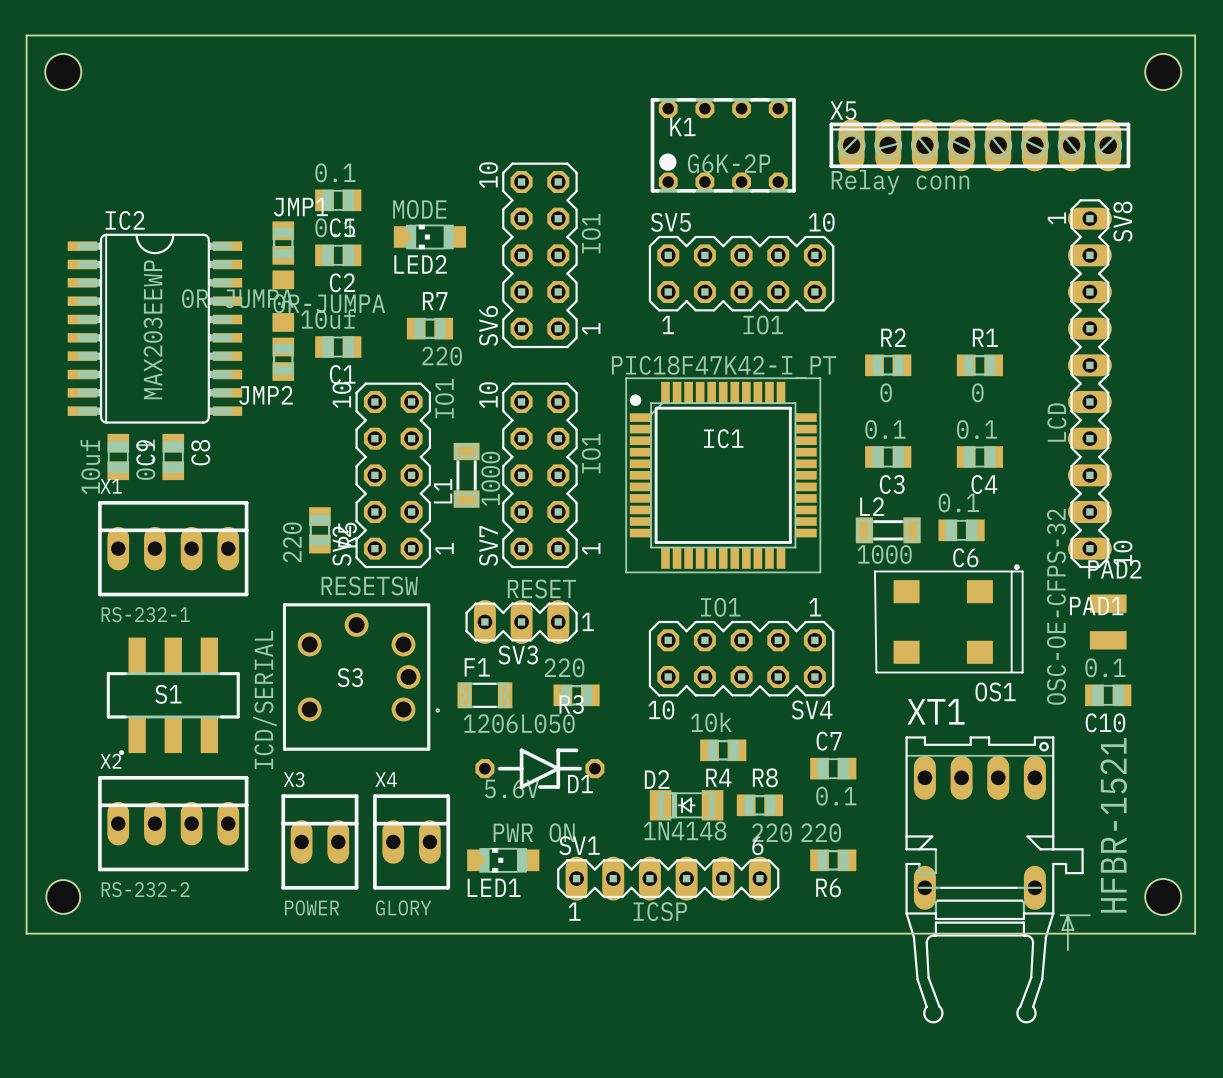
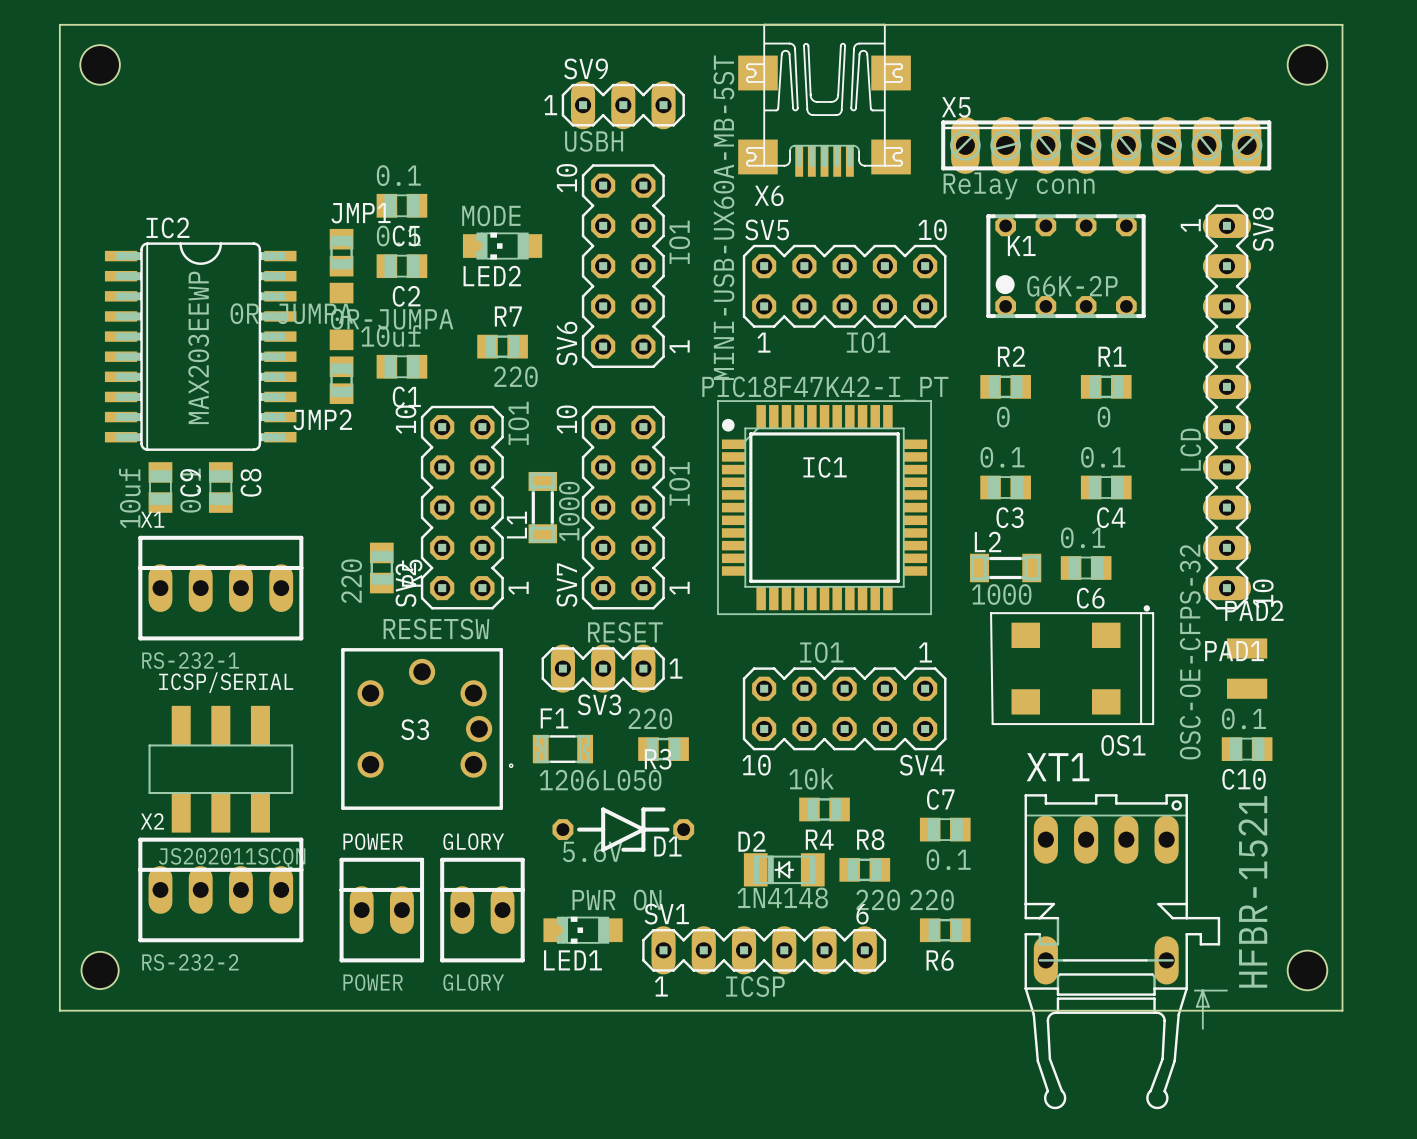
X6: none -> MINI-USB-UX60A-MB-5ST (824, 100)
SV9: none -> USBH (623, 105)
K1 position: (723, 145) -> (1066, 266)
S1: ICD/SERIAL (173, 696) -> none
ICSP/SERIAL: none -> JS202011SCQN (220, 769)
X3 name: X3 (294, 779) -> POWER (373, 841)
X4 name: X4 (386, 779) -> GLORY (473, 841)

